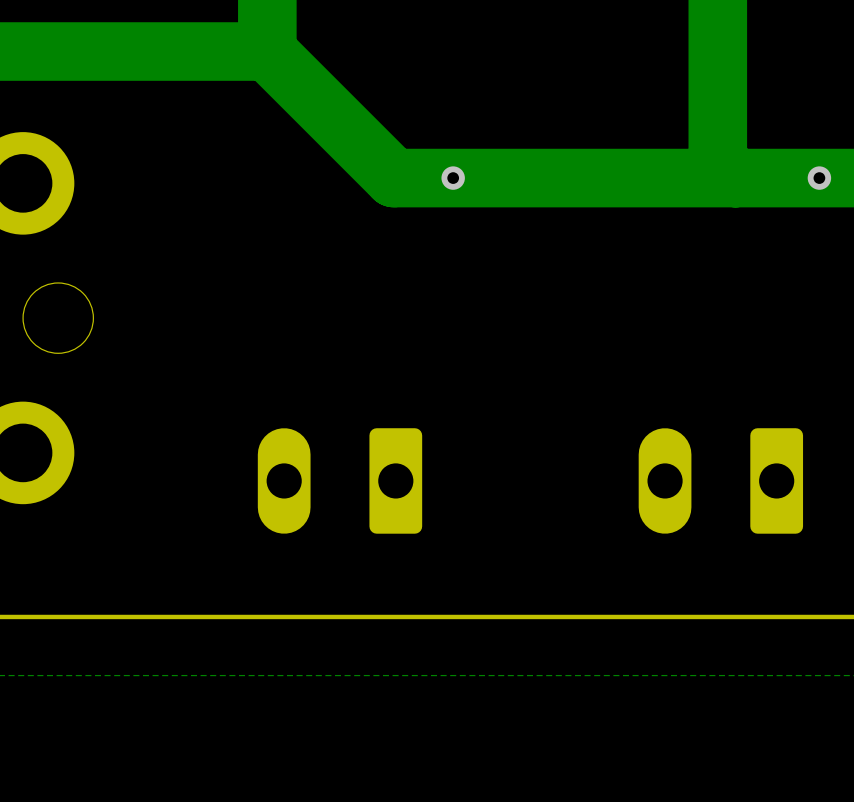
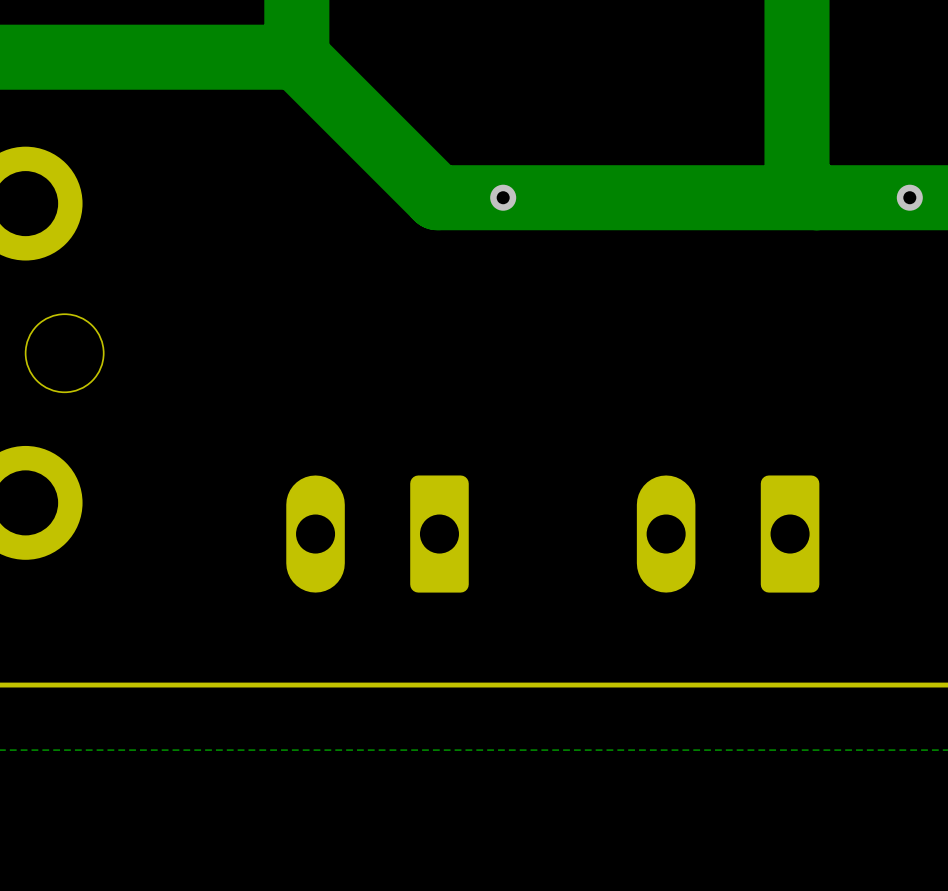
part position: (720, 480) -> (728, 534)

